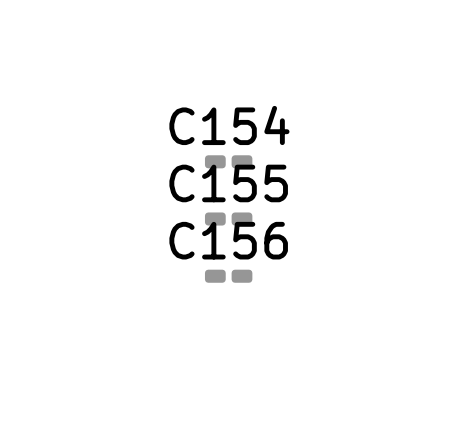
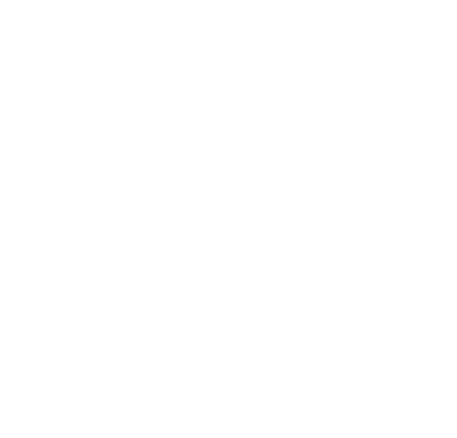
C154: (228, 161) -> none
C155: (228, 219) -> none
C156: (228, 276) -> none

